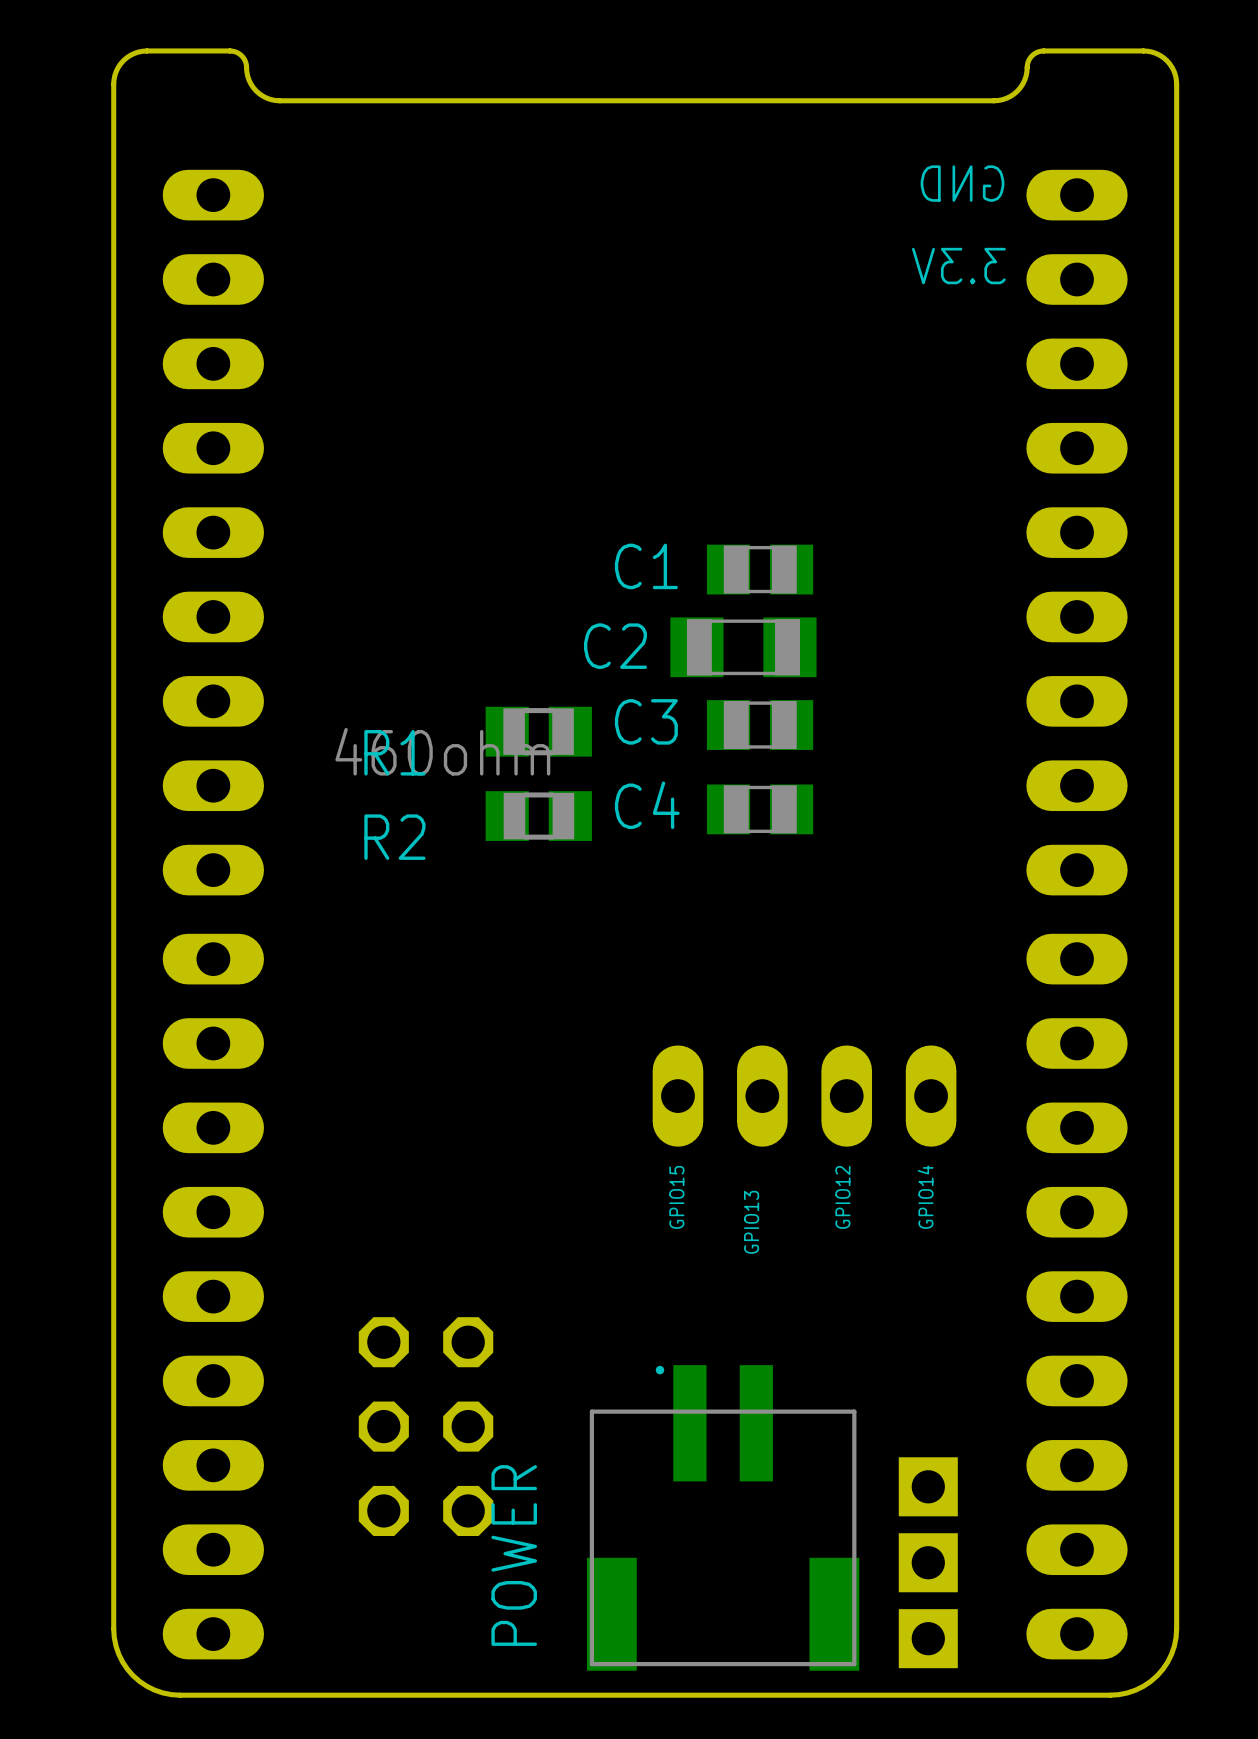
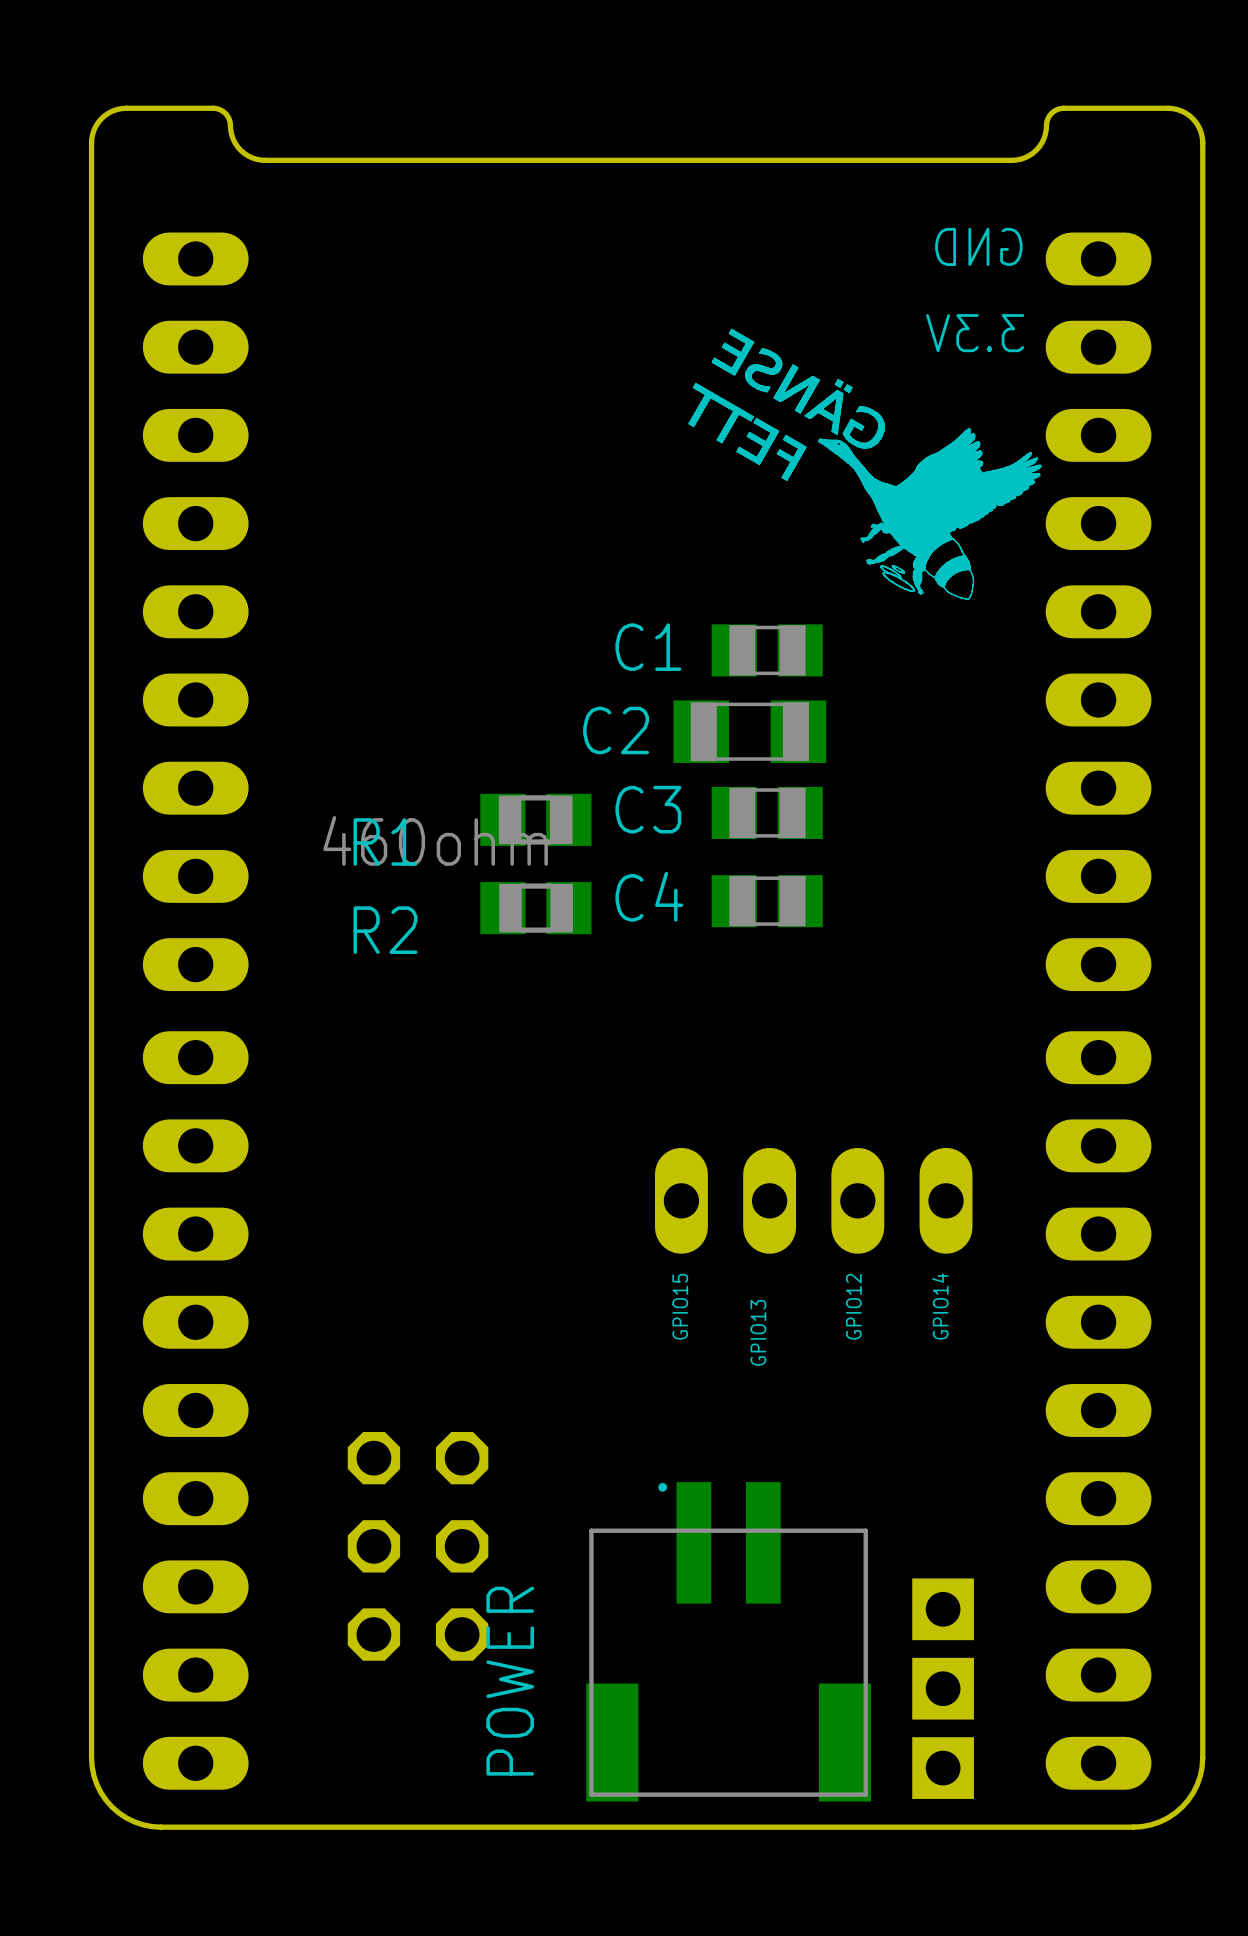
drawing: none -> [688, 328, 1042, 601]

